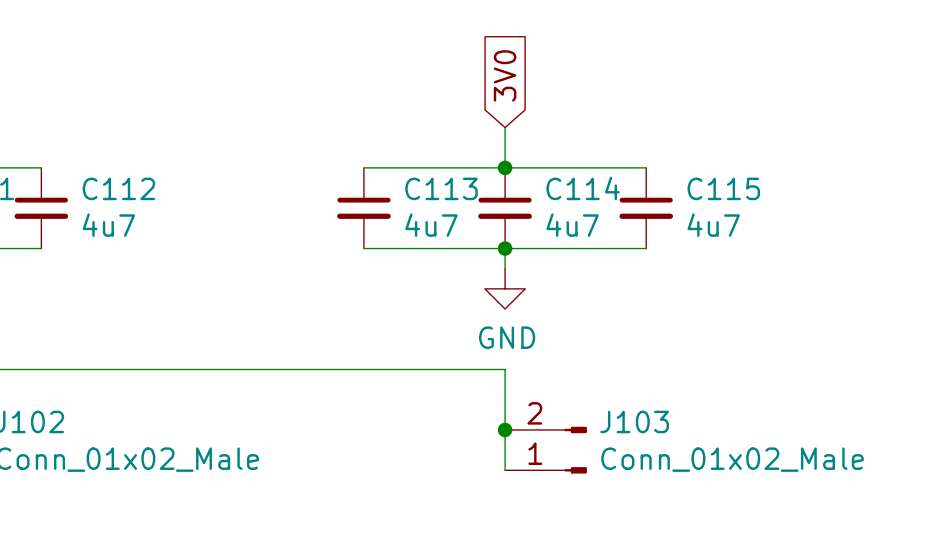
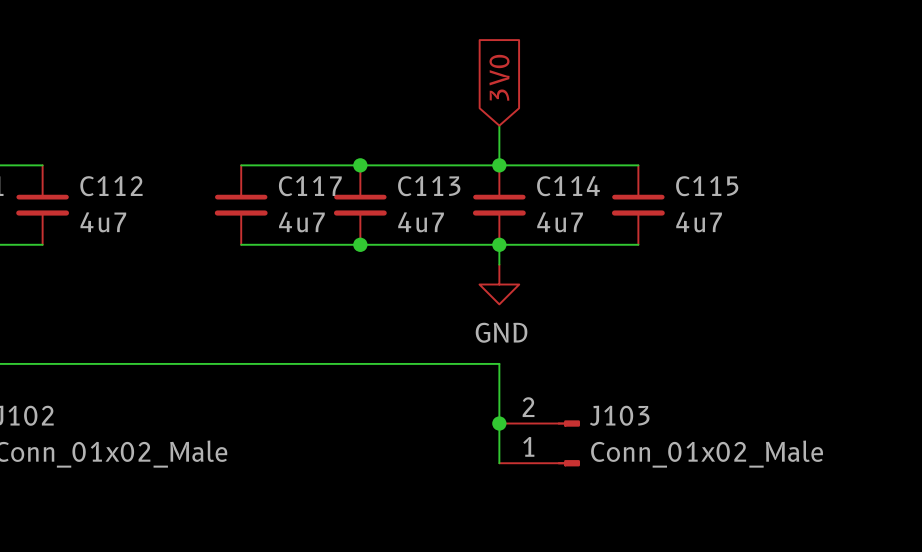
wire: none -> (241, 165) (360, 165)
junction: none -> (360, 165)
C117: none -> 4u7 (241, 205)
wire: none -> (241, 244) (360, 244)
junction: none -> (360, 244)

